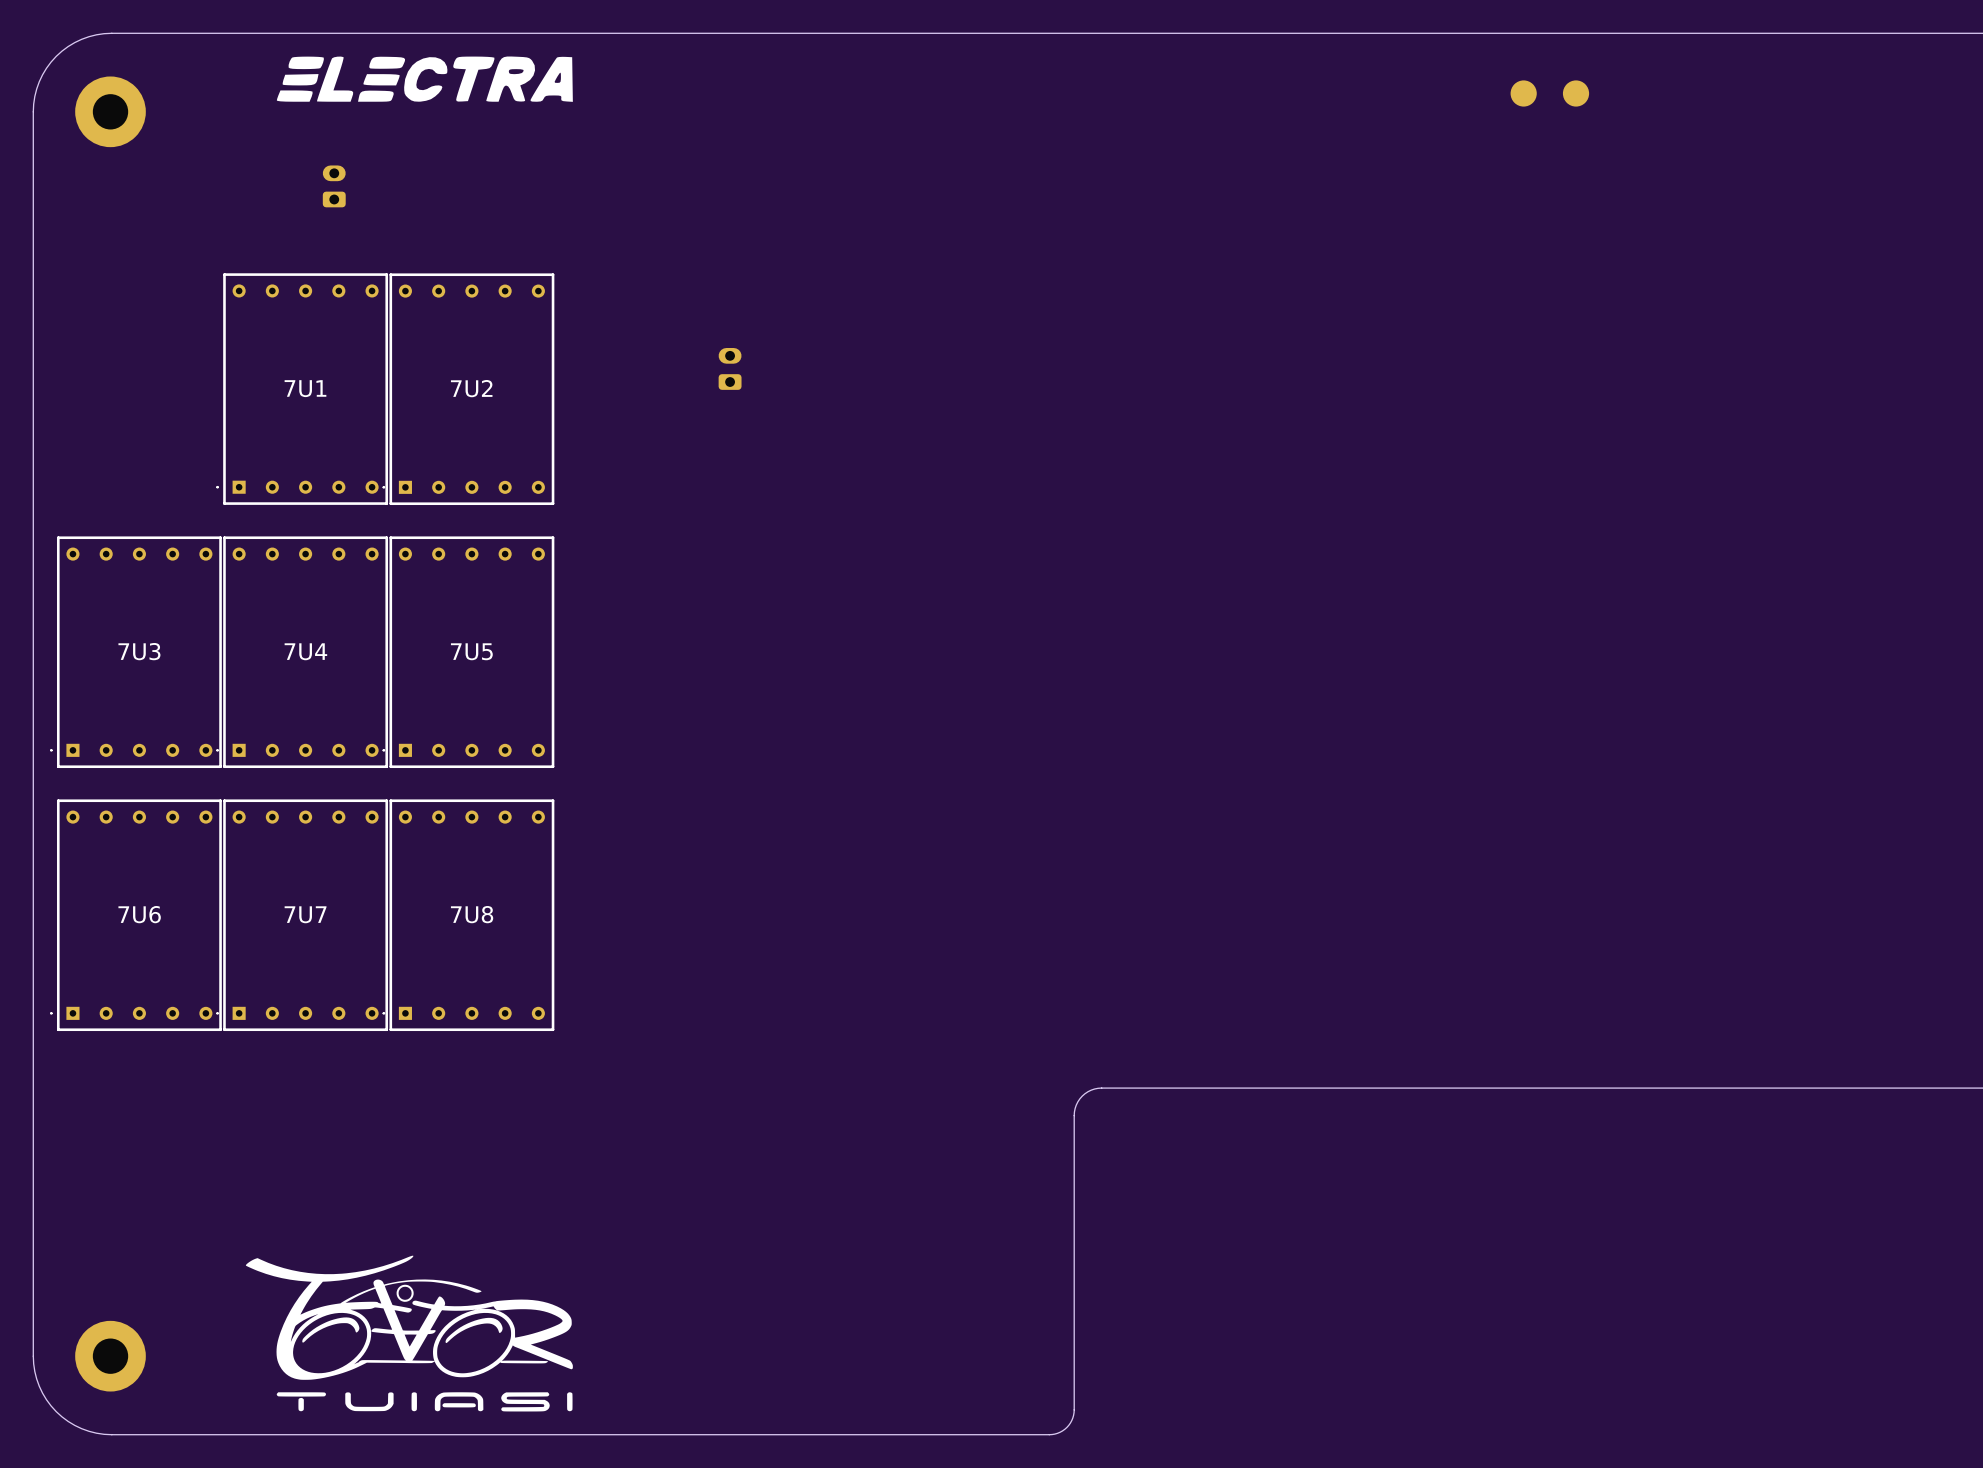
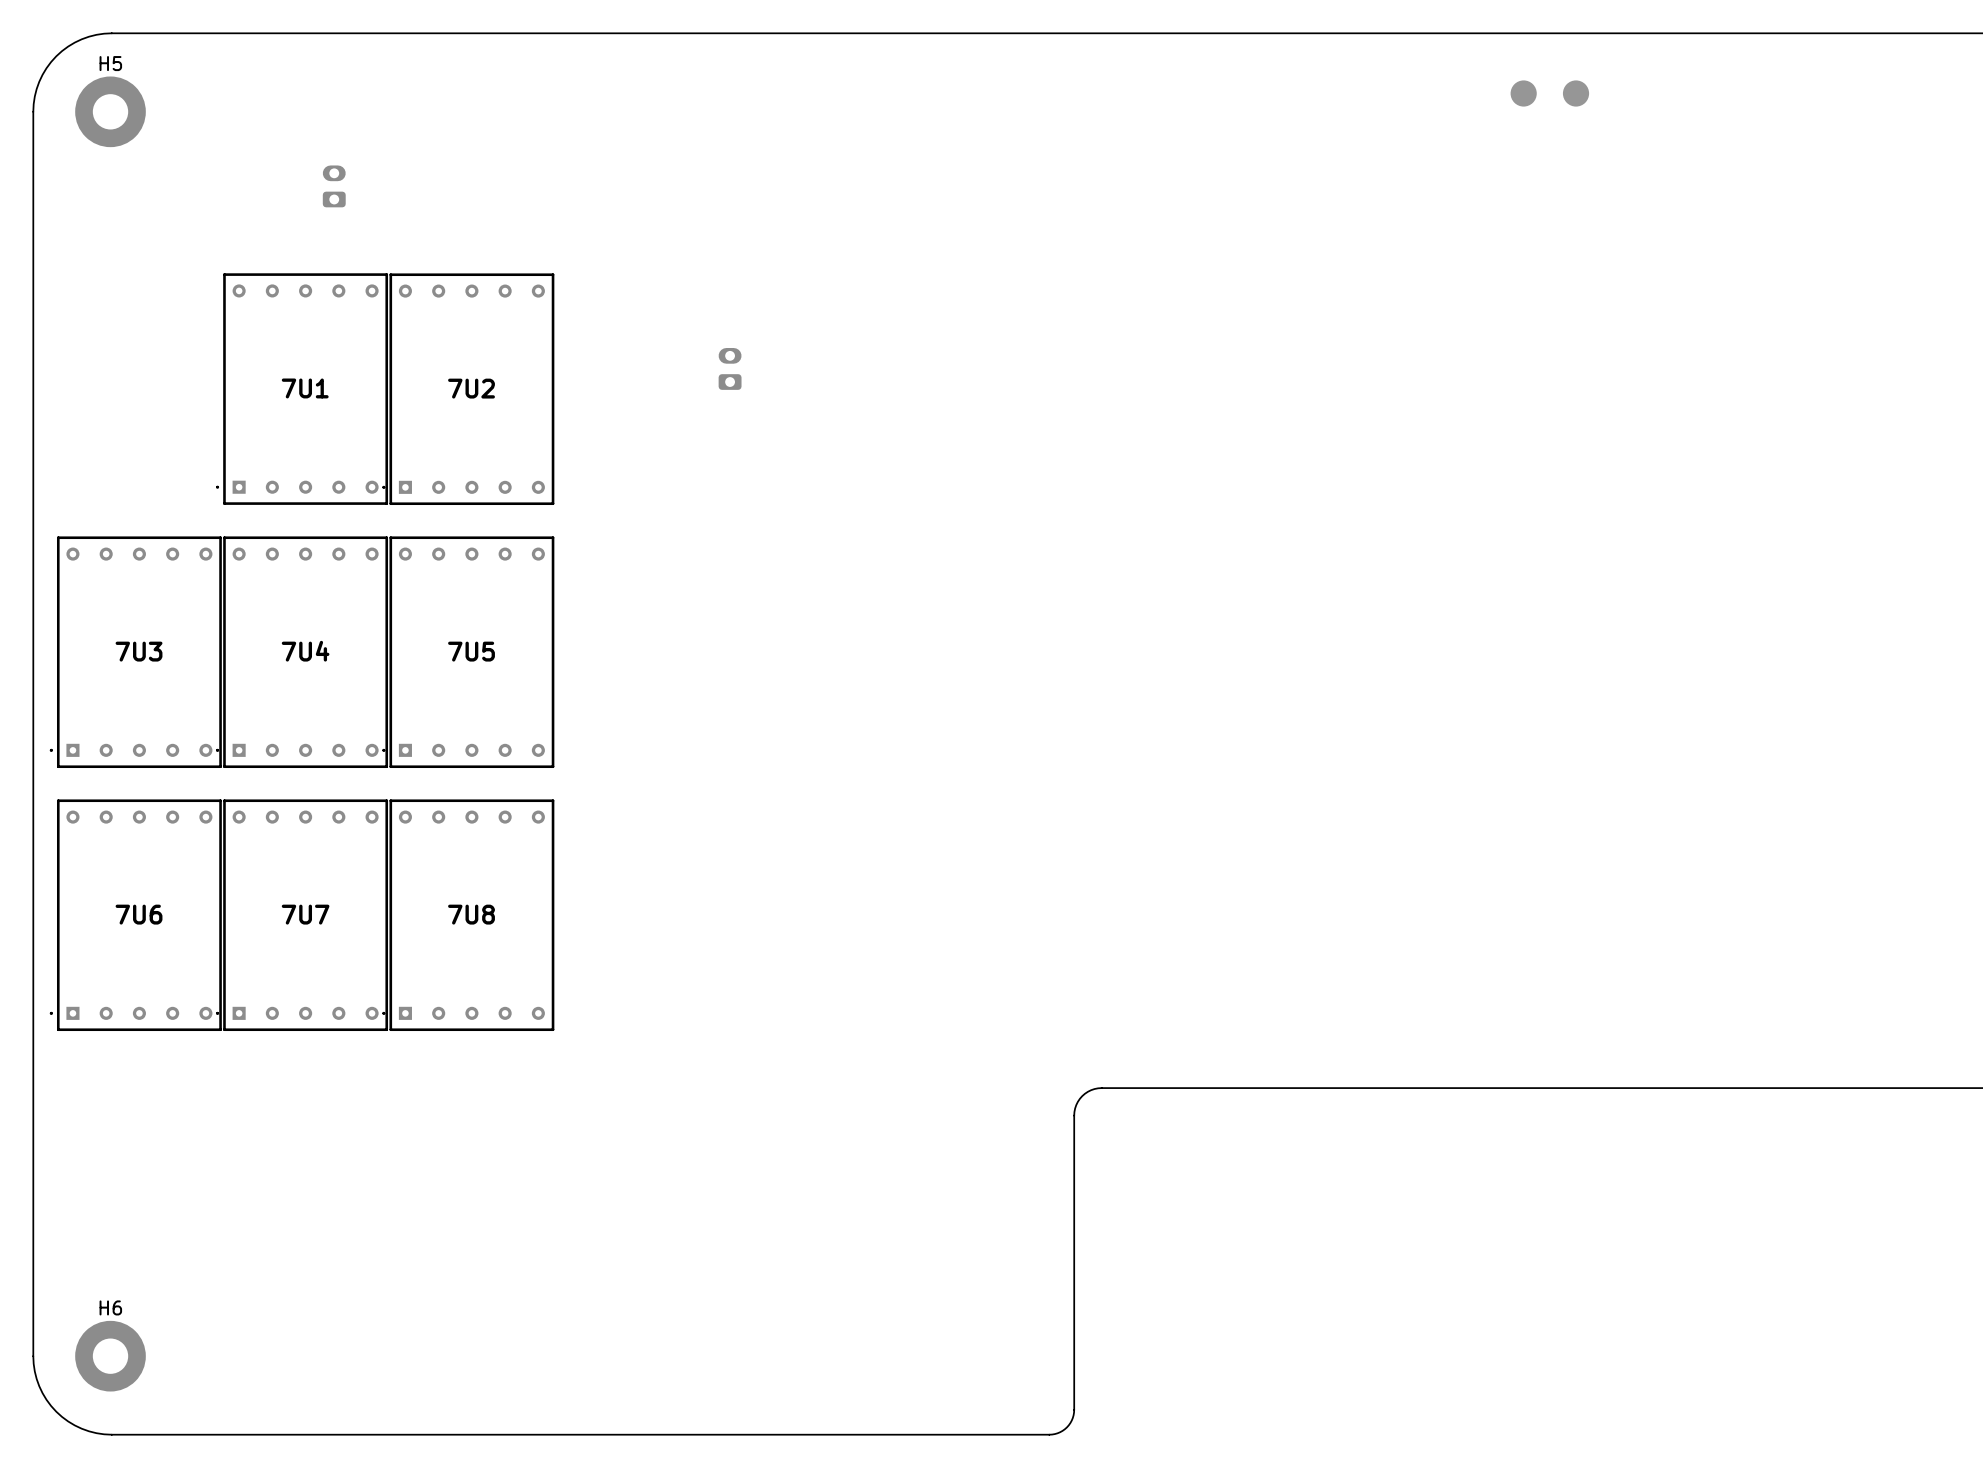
drawing: [276, 56, 573, 102] -> none
H5 name: none -> H5 (110, 63)
drawing: [245, 1255, 573, 1412] -> none
H6 name: none -> H6 (110, 1307)

